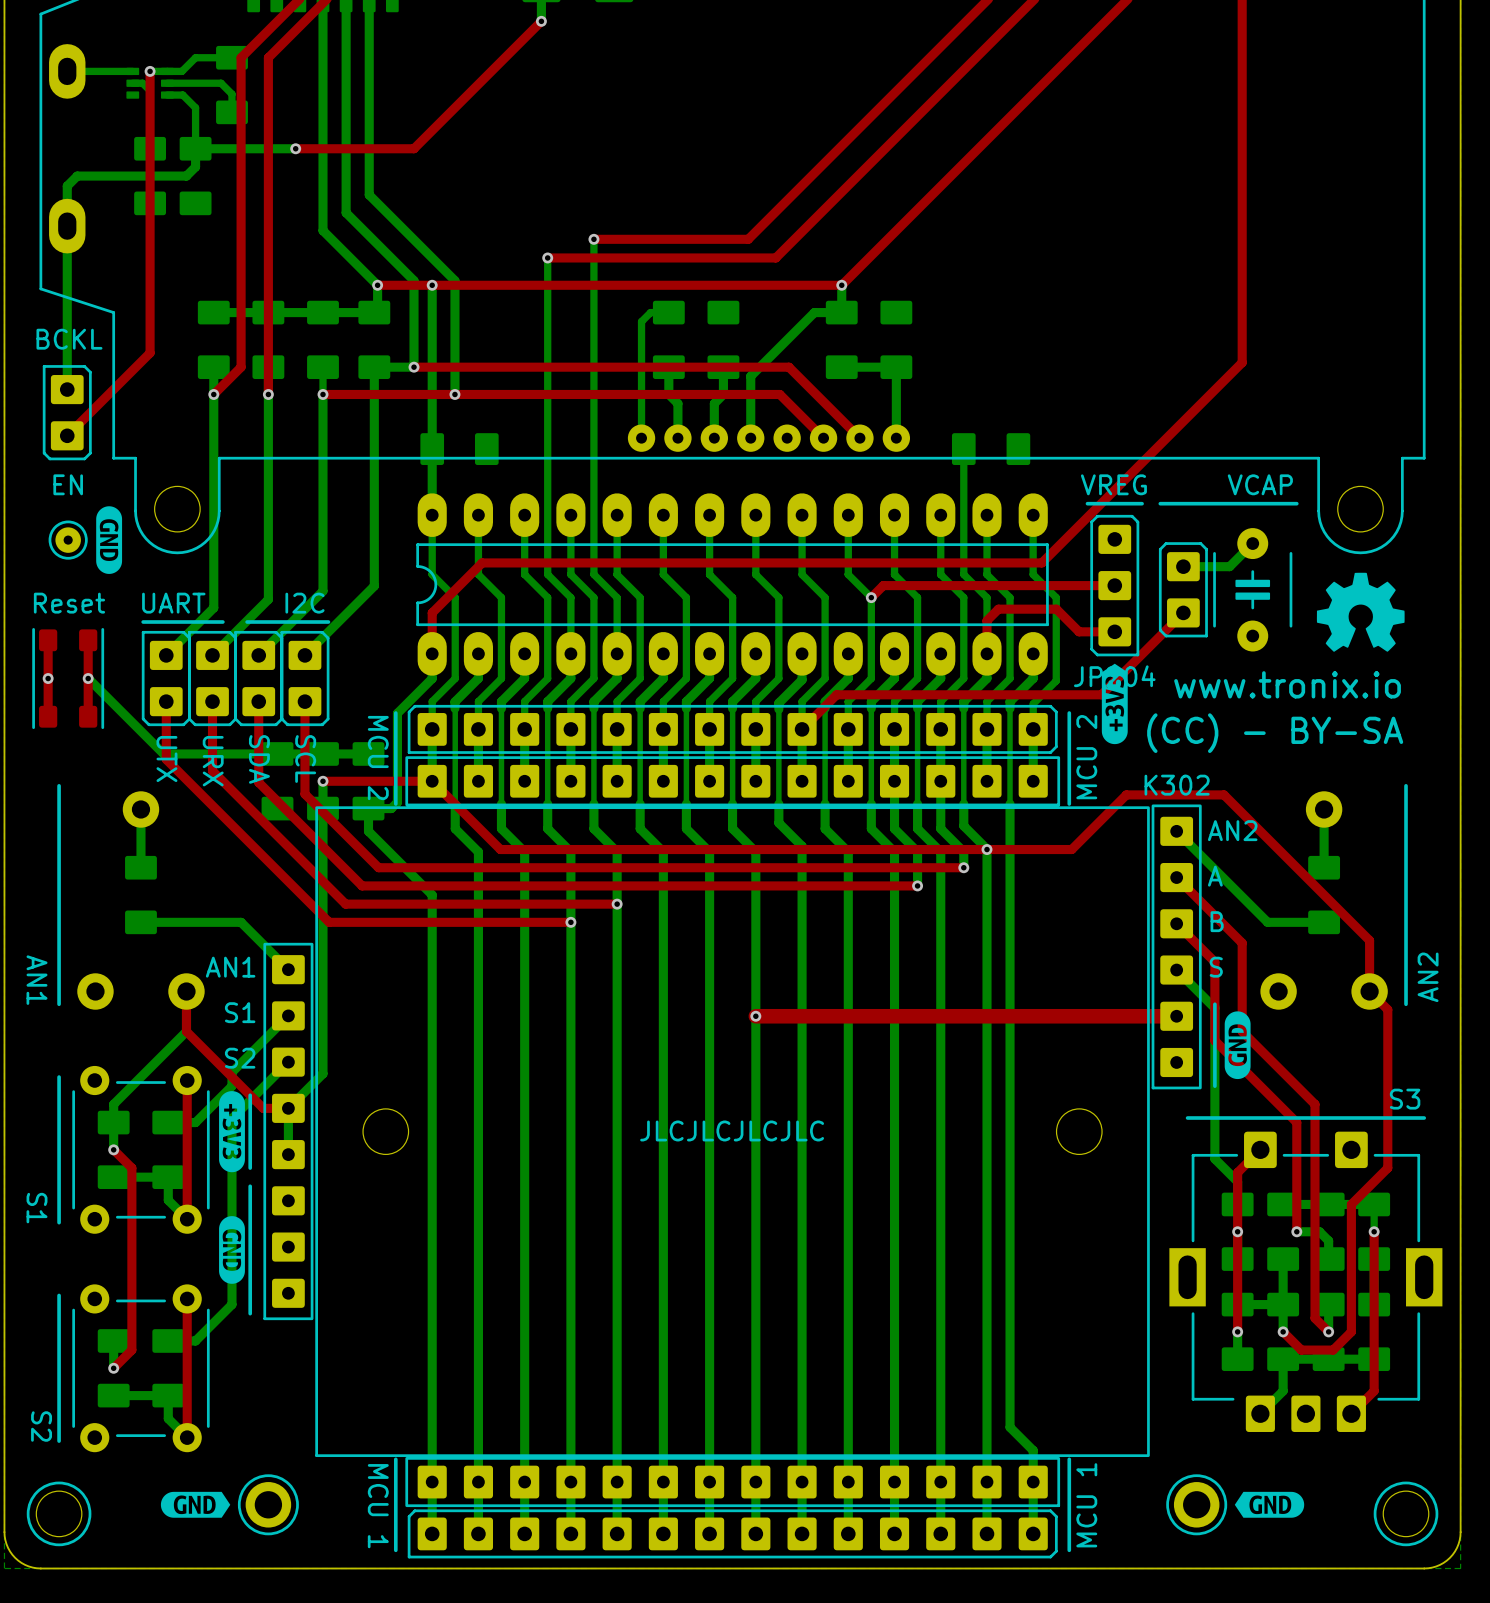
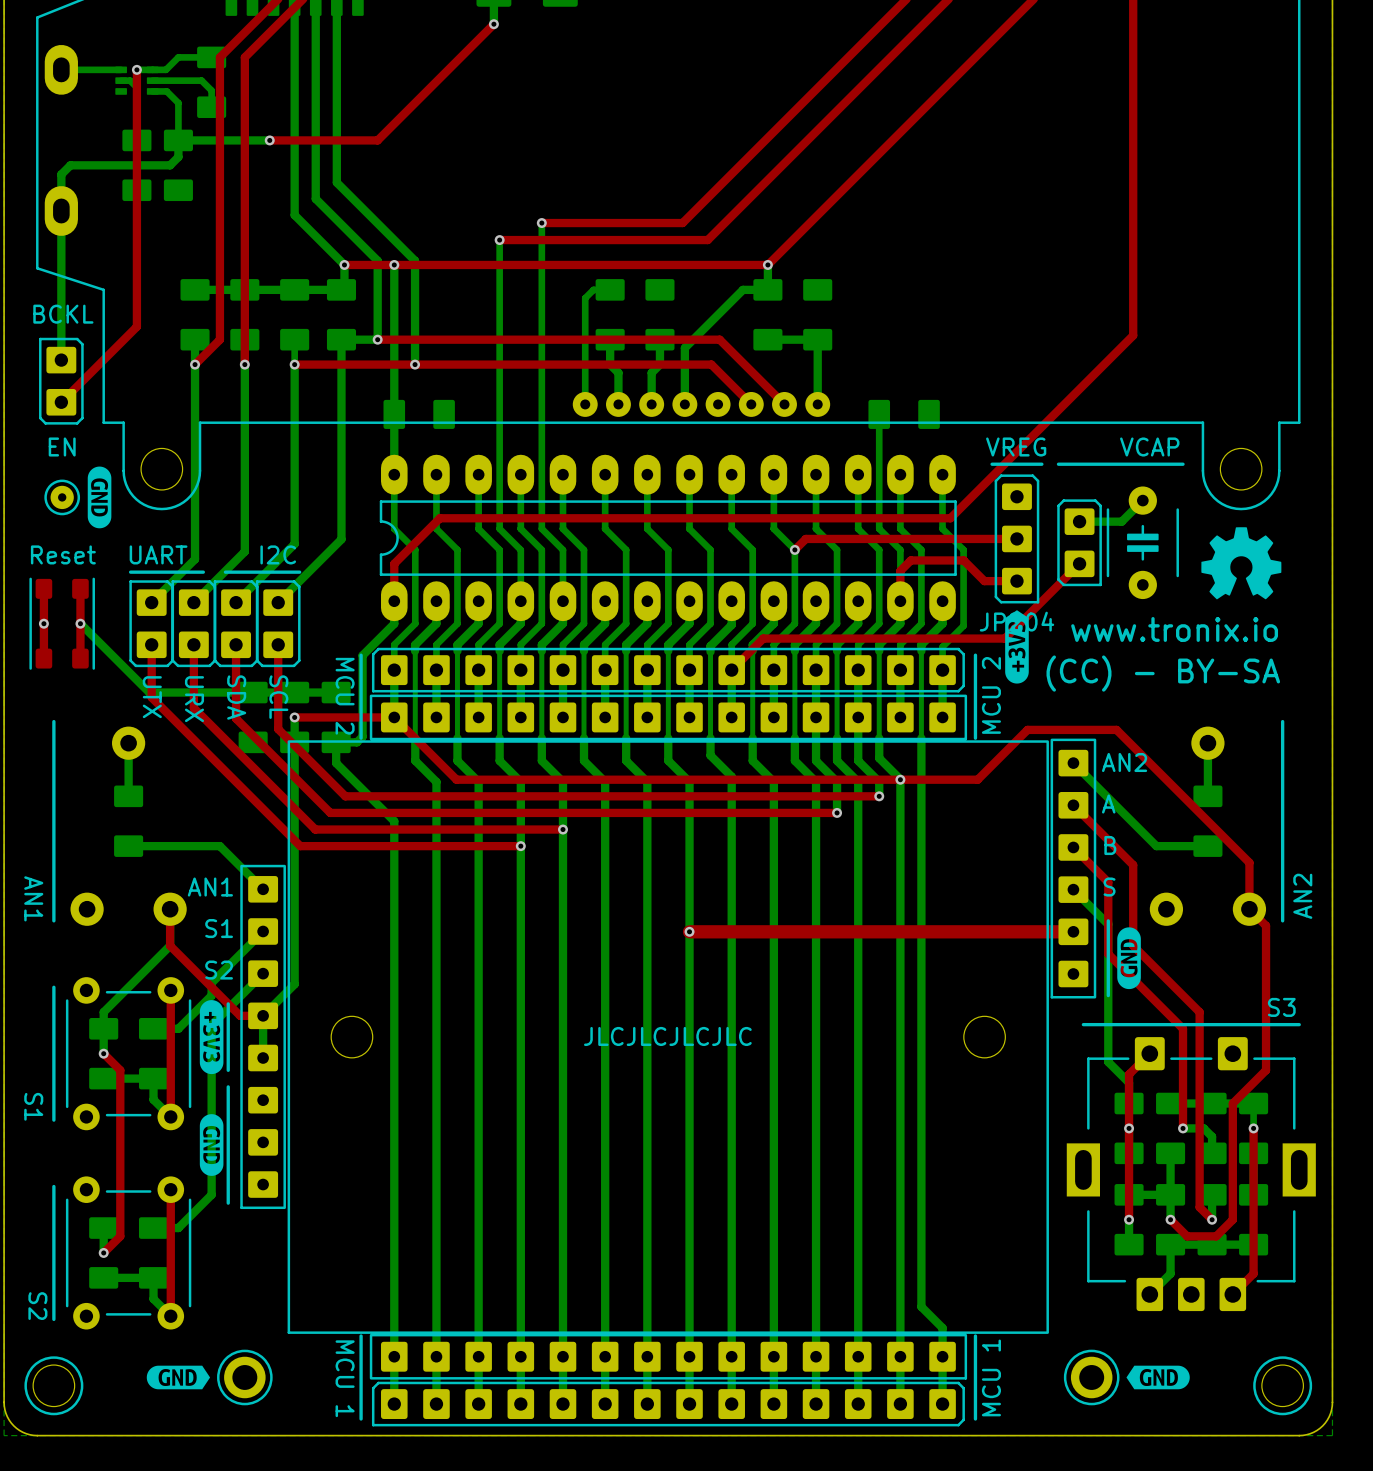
K302 name: K302 (1177, 785) -> none
part footprint: [1169, 1131, 1443, 1432] -> [1066, 1037, 1316, 1312]

